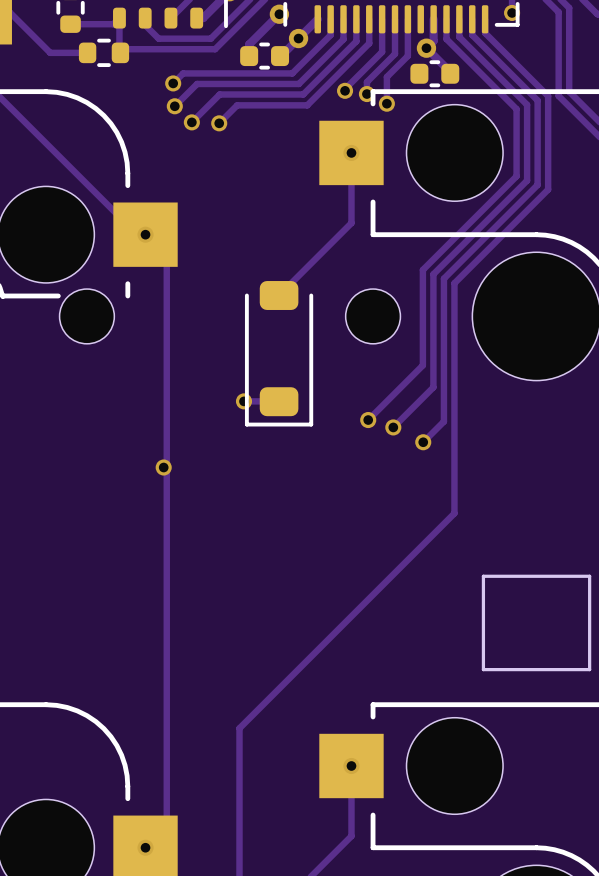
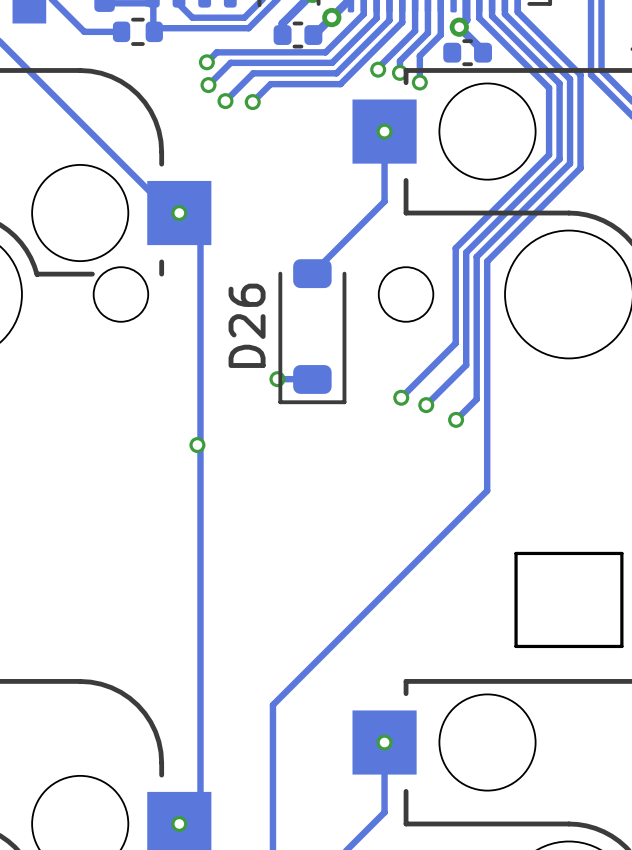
D26 name: none -> D26 (247, 325)

